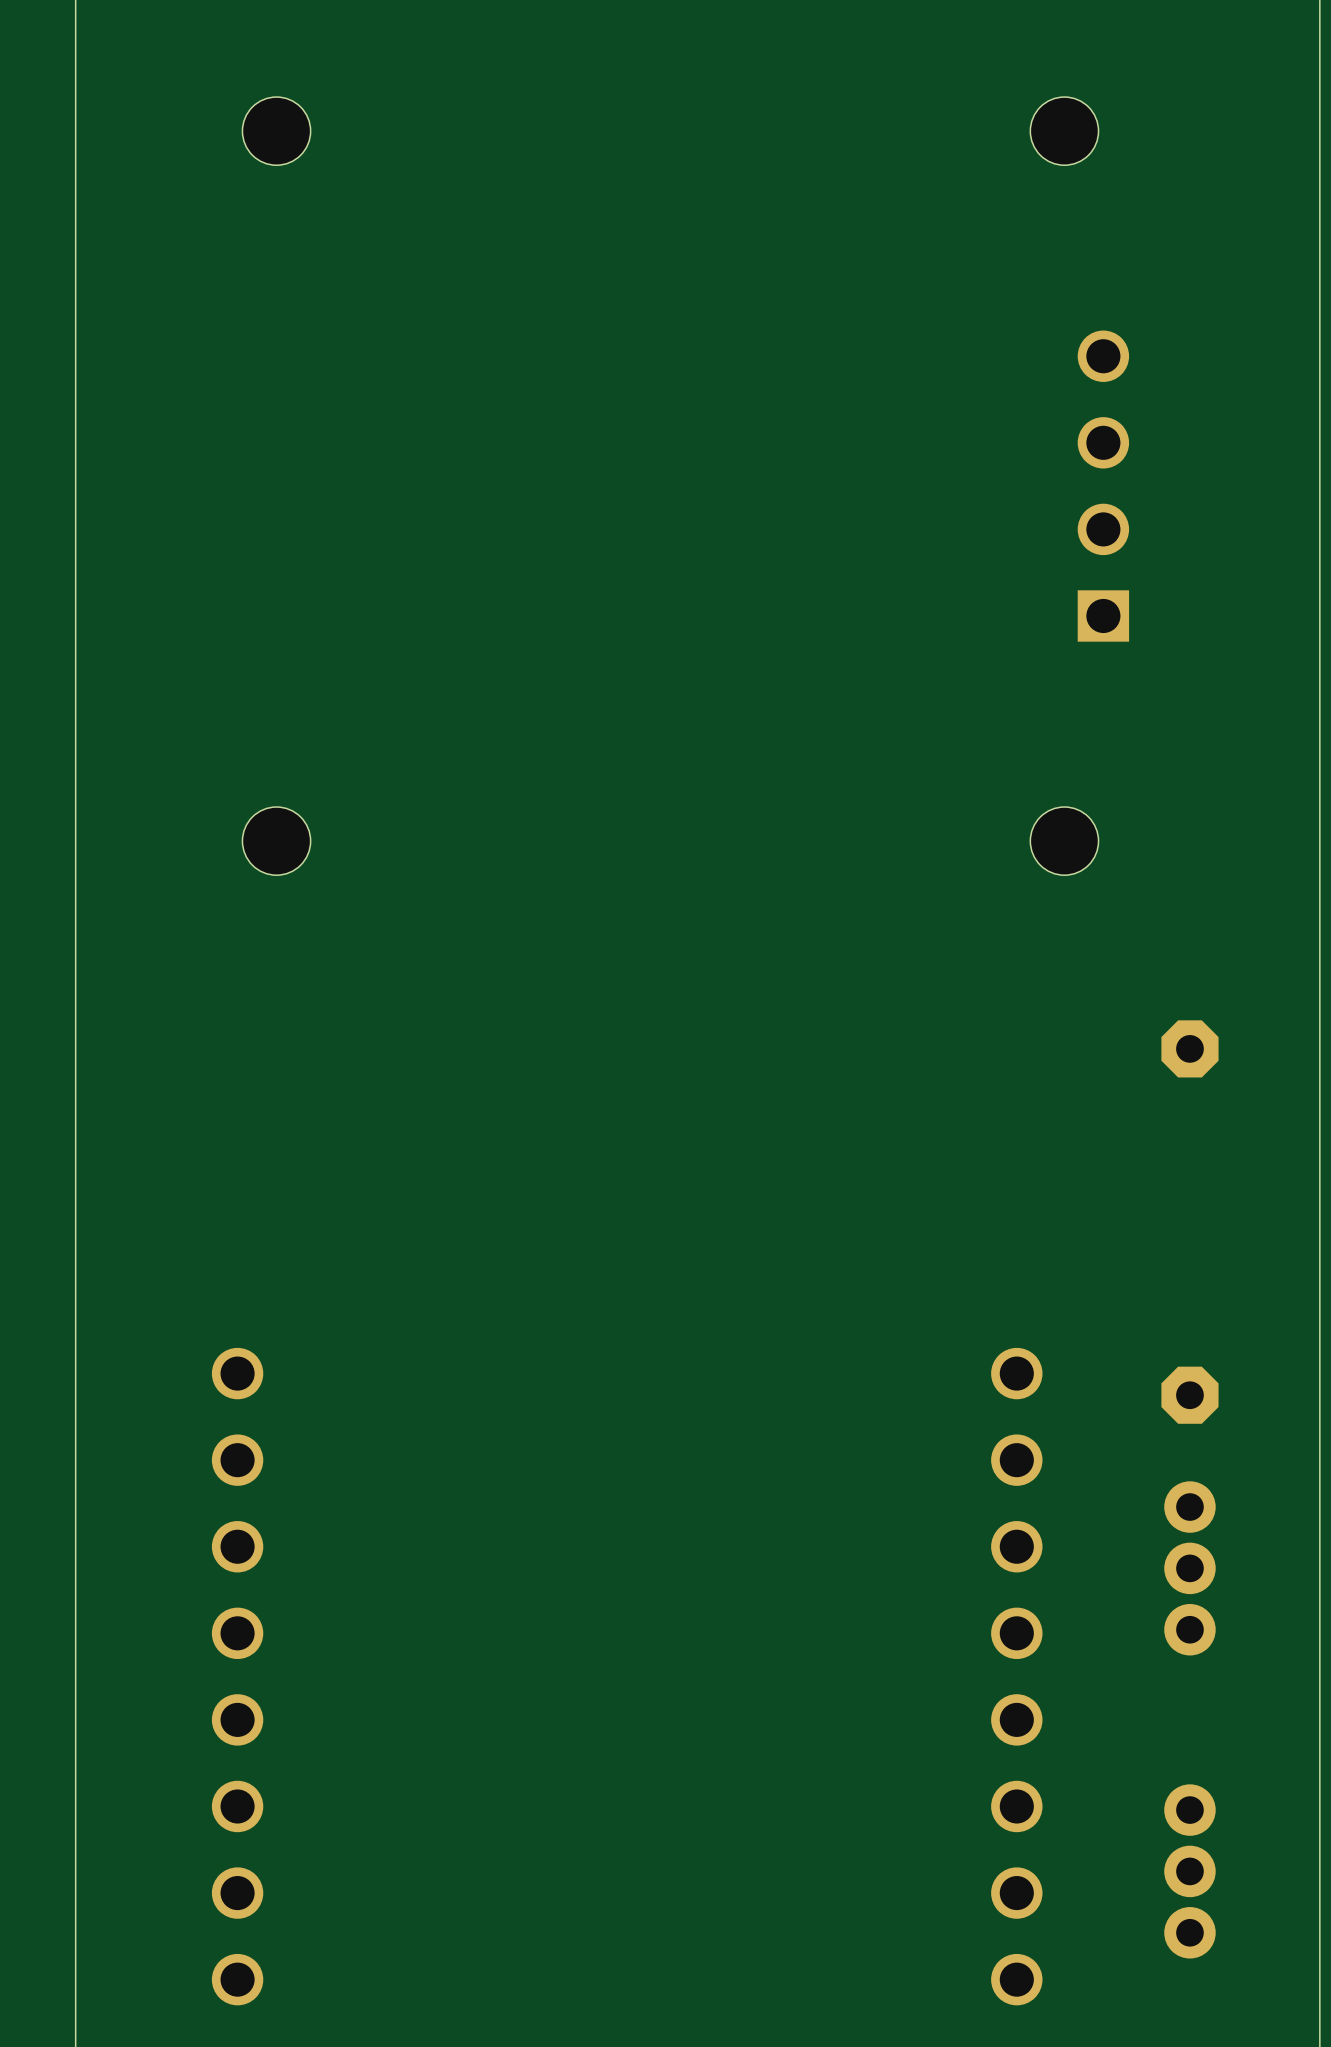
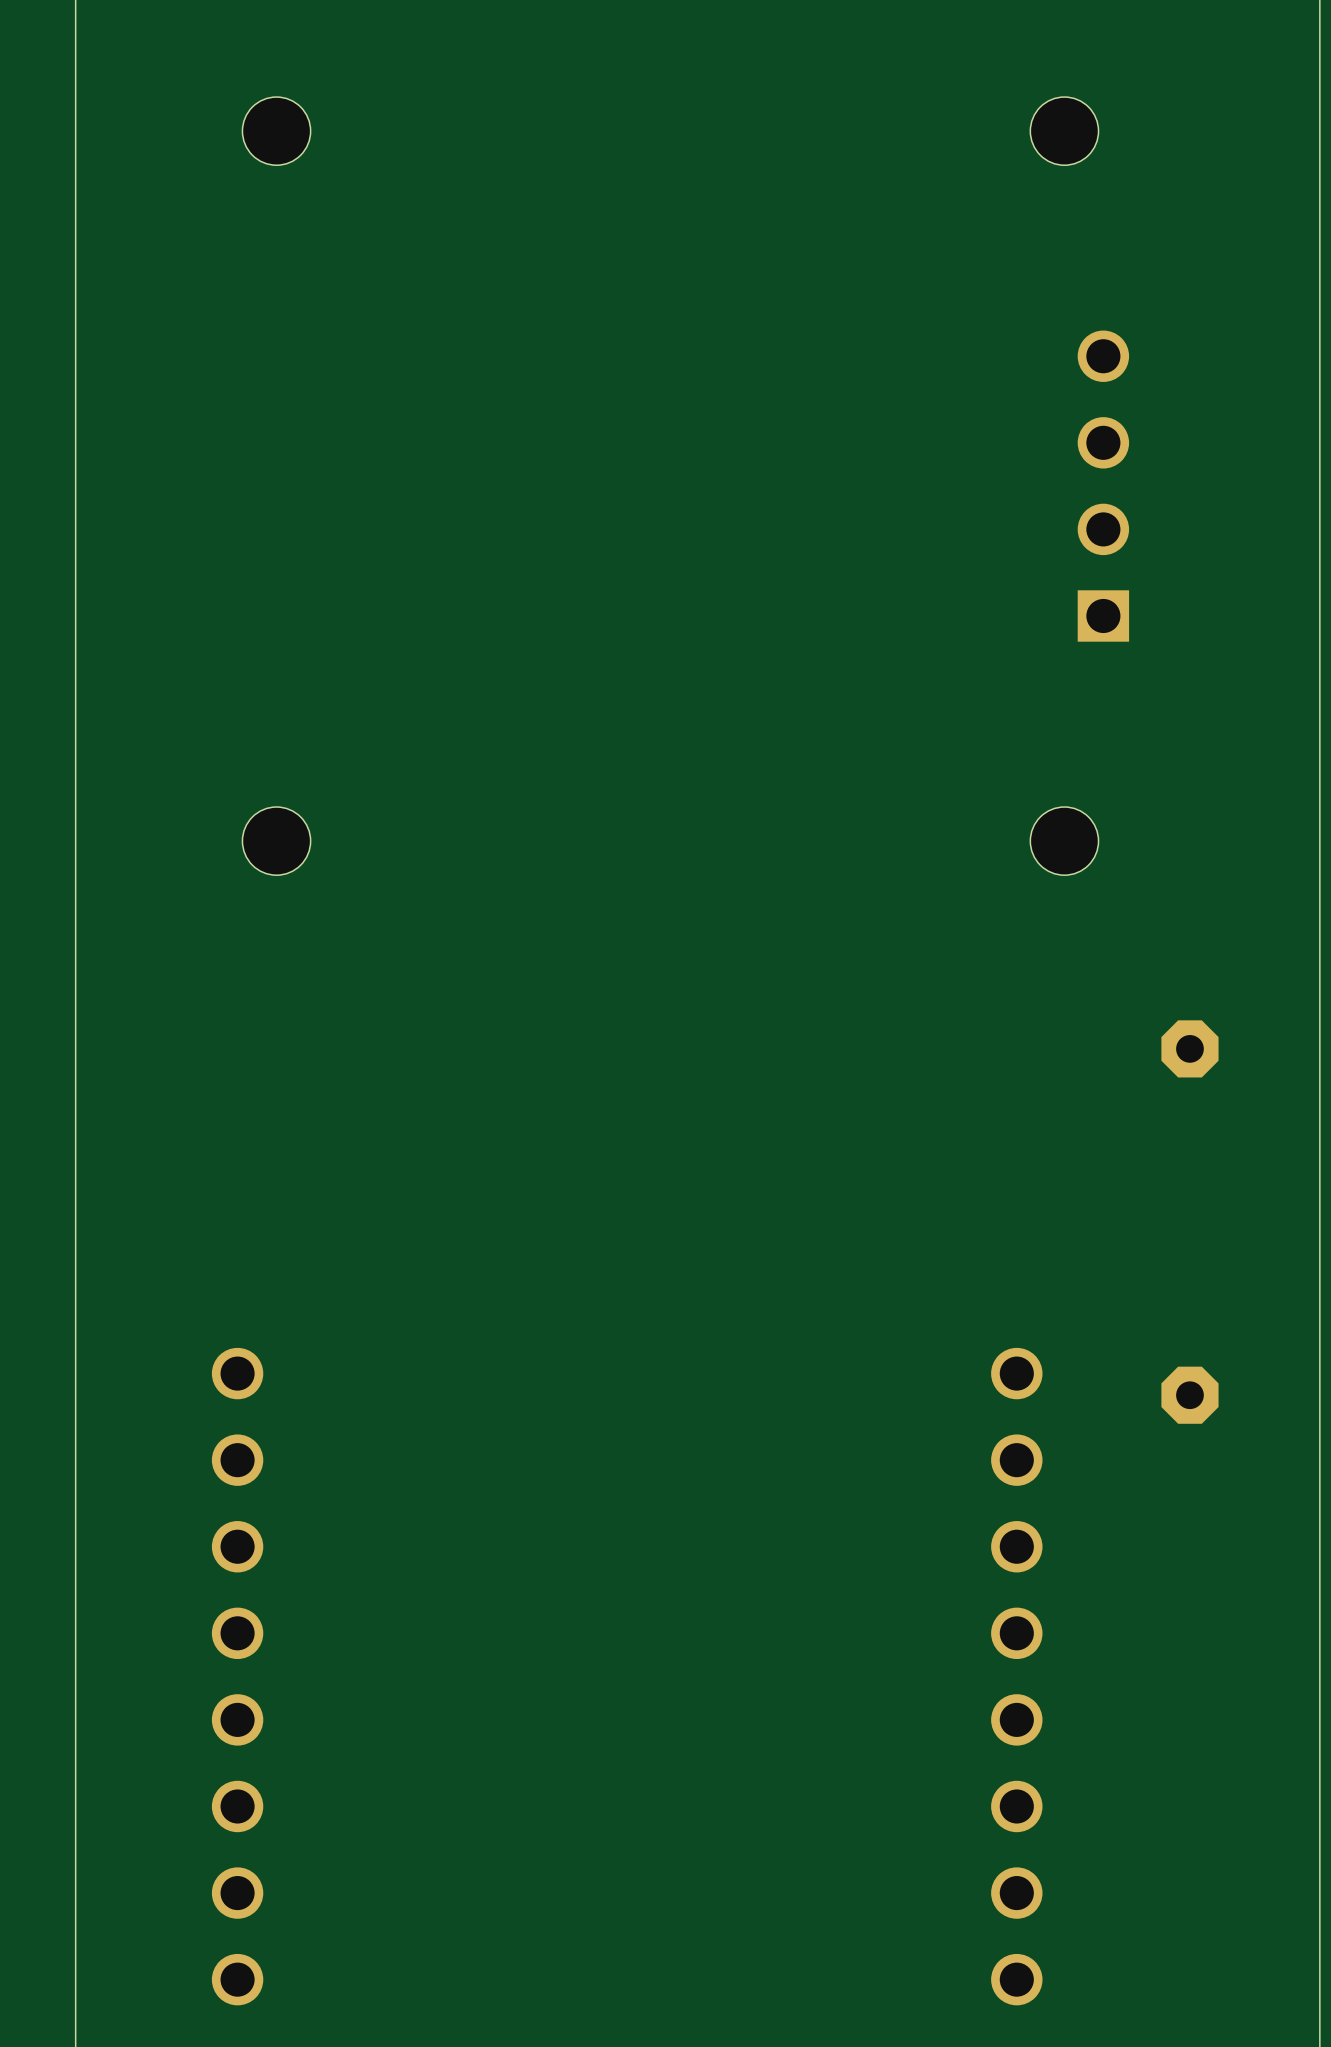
part: (1189, 1568) -> none
part: (1189, 1871) -> none

